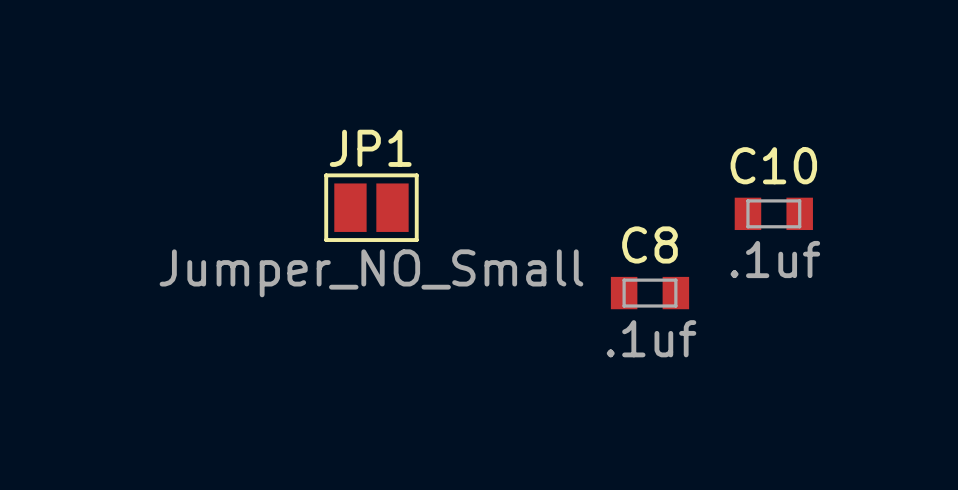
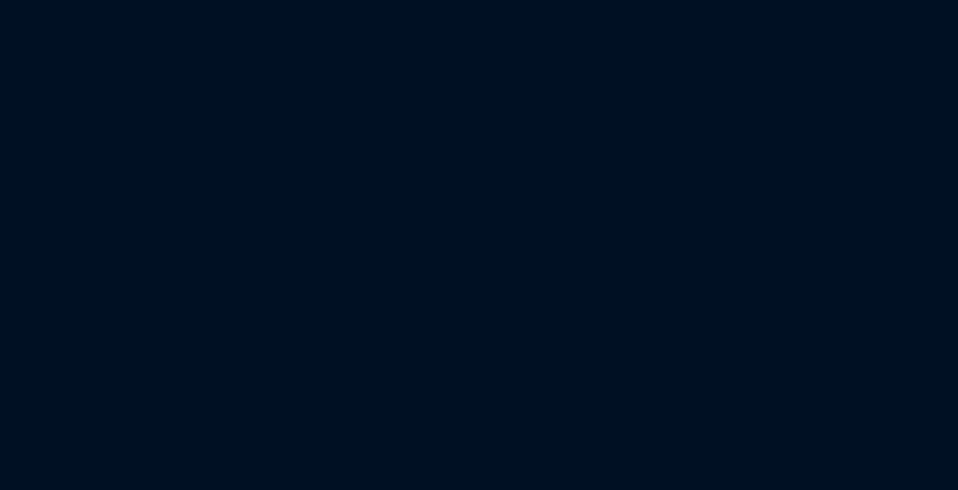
JP1: Jumper_NO_Small (371, 207) -> none
C10: .1uf (773, 213) -> none
C8: .1uf (649, 293) -> none

